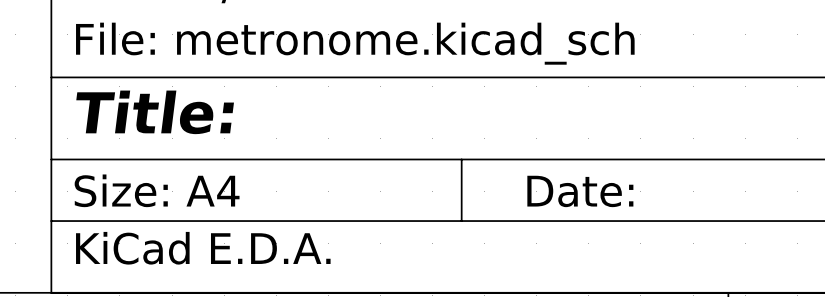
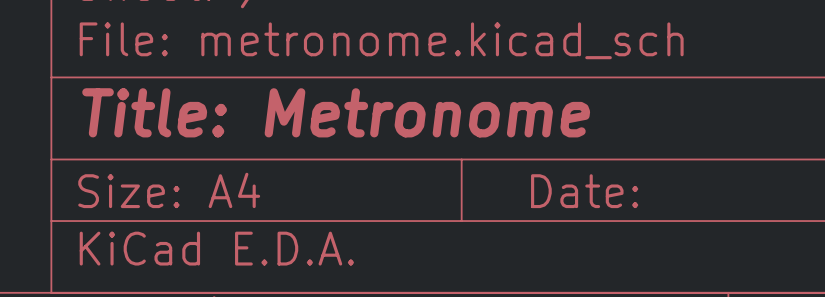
title block: Title: (155, 112) -> Title: Metronome (336, 112)

